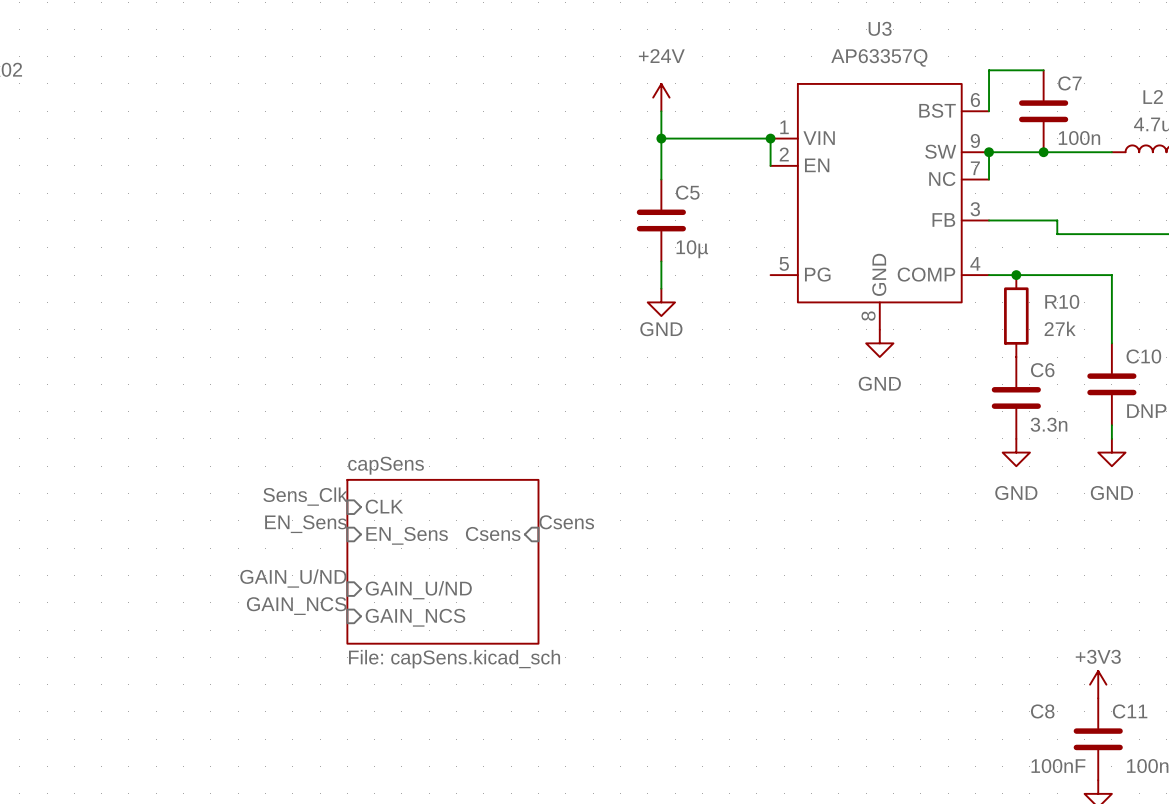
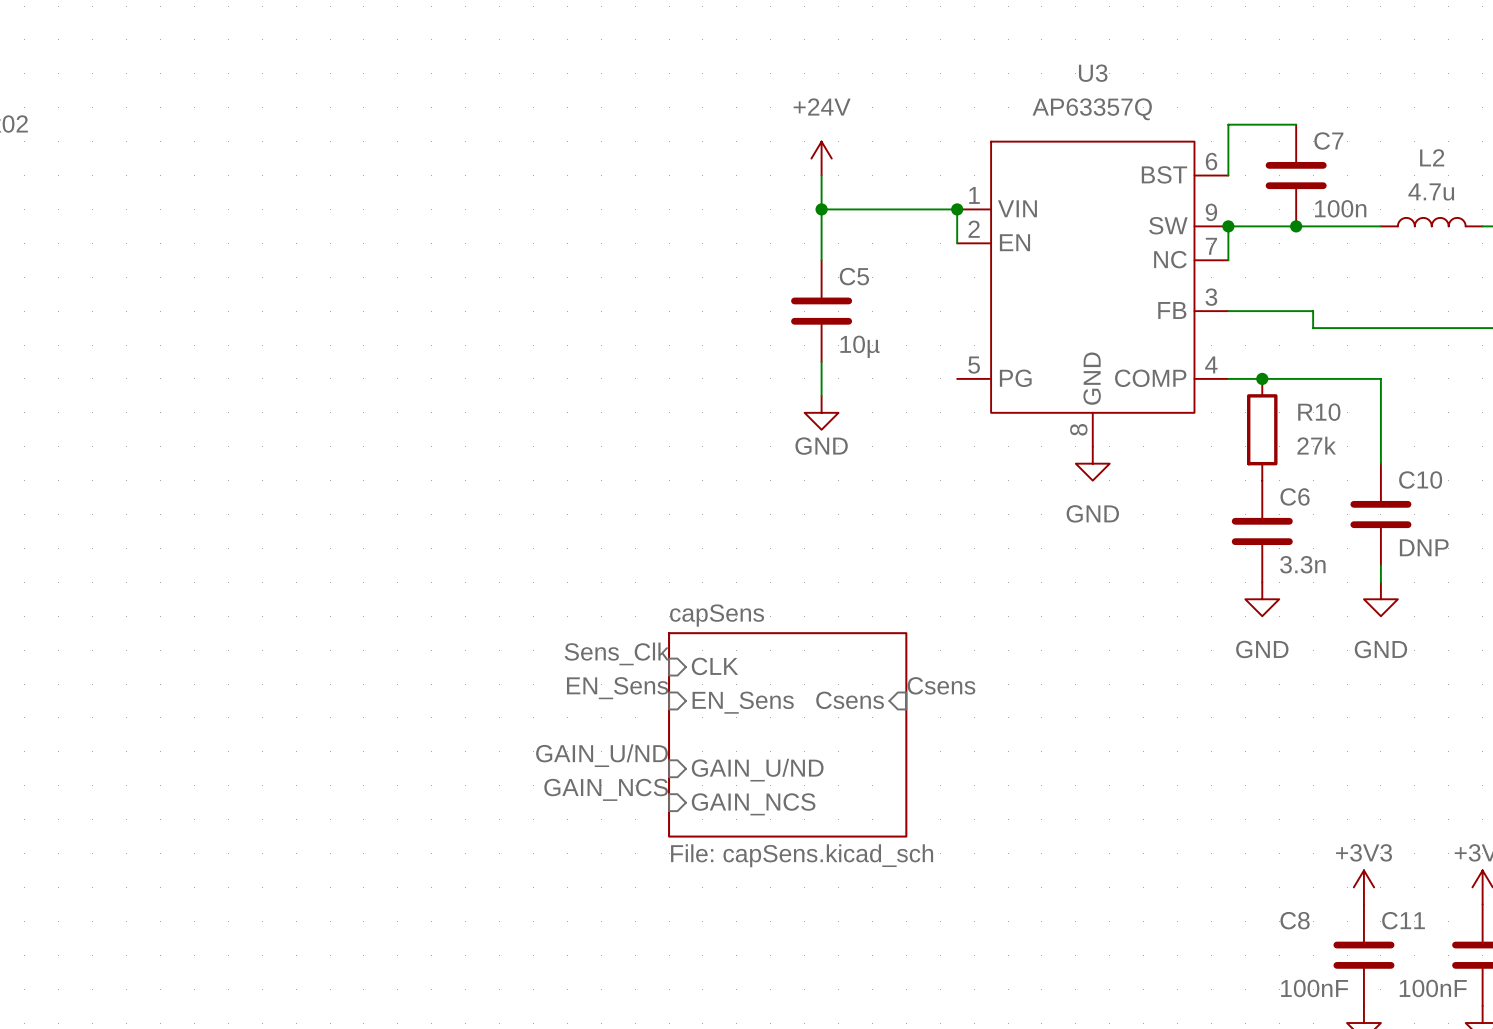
label position: Sens_Clk (305, 496) -> Sens_Clk (616, 653)
sheet pin position: CLK (384, 506) -> CLK (715, 666)
label: Csens (566, 522) -> EN_Sens (617, 688)
label: none -> Csens (941, 685)
label: EN_Sens (305, 524) -> none
sheet pin position: Csens (493, 533) -> Csens (850, 700)
sheet pin position: EN_Sens (407, 535) -> EN_Sens (743, 702)
sheet capSens position: (442, 561) -> (787, 734)
label position: GAIN_U/ND (293, 578) -> GAIN_U/ND (601, 755)
sheet pin position: GAIN_U/ND (418, 590) -> GAIN_U/ND (757, 770)
label position: GAIN_NCS (296, 606) -> GAIN_NCS (606, 789)
sheet pin position: GAIN_NCS (415, 617) -> GAIN_NCS (753, 804)

